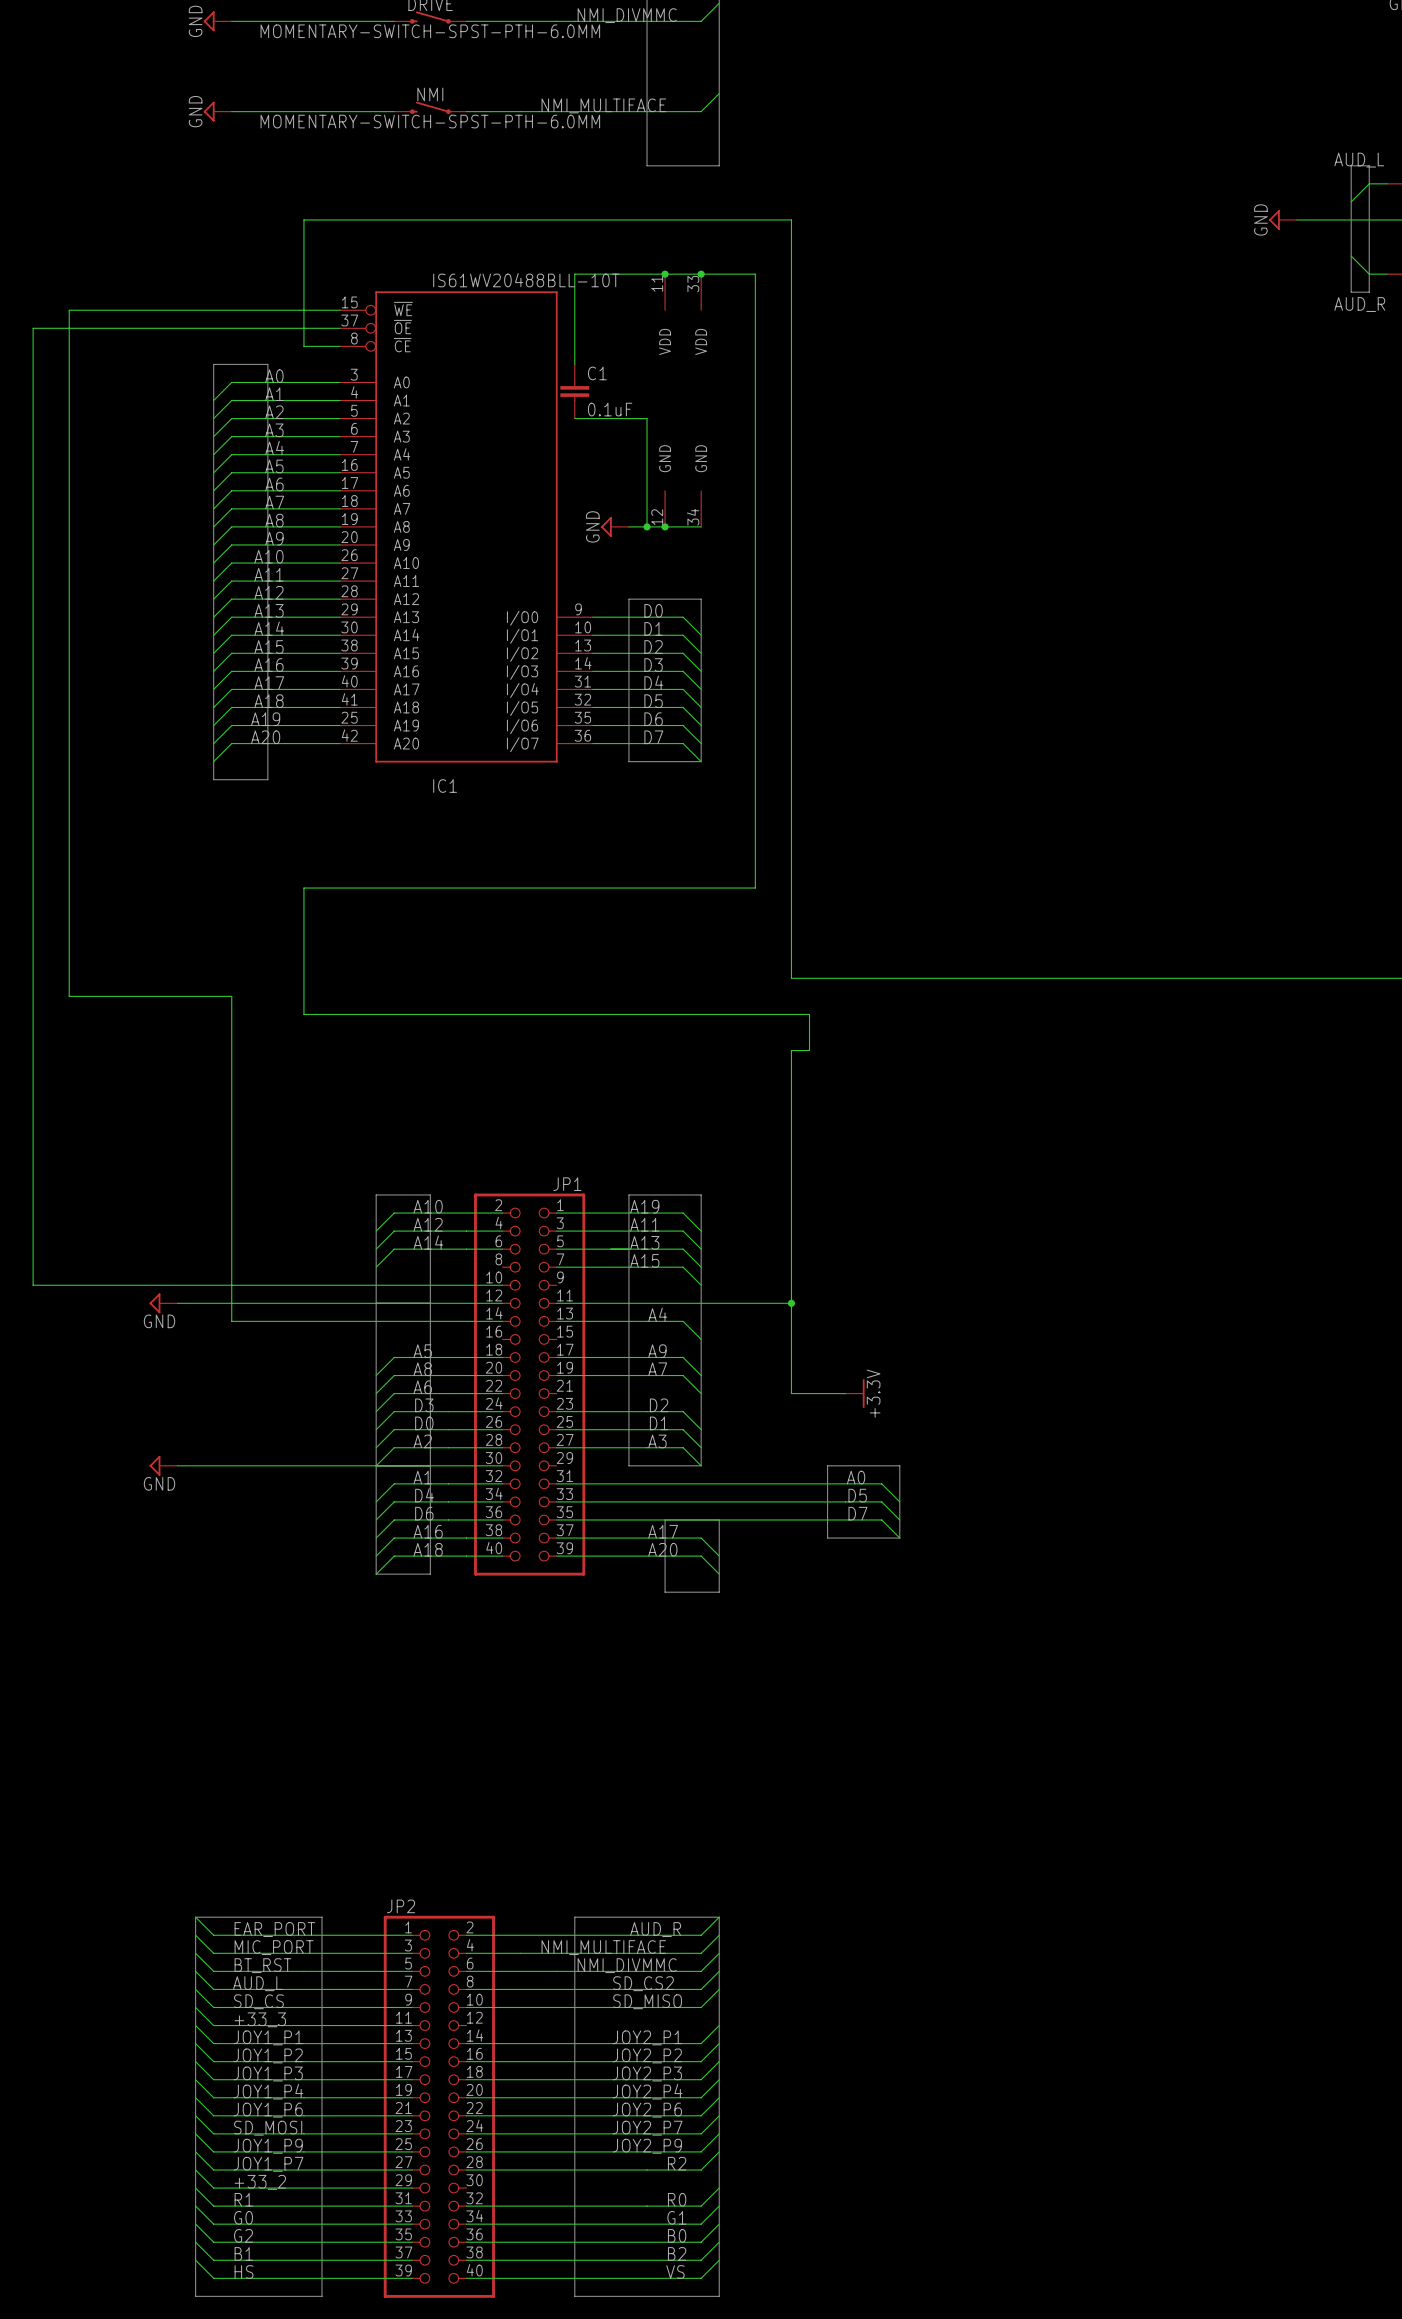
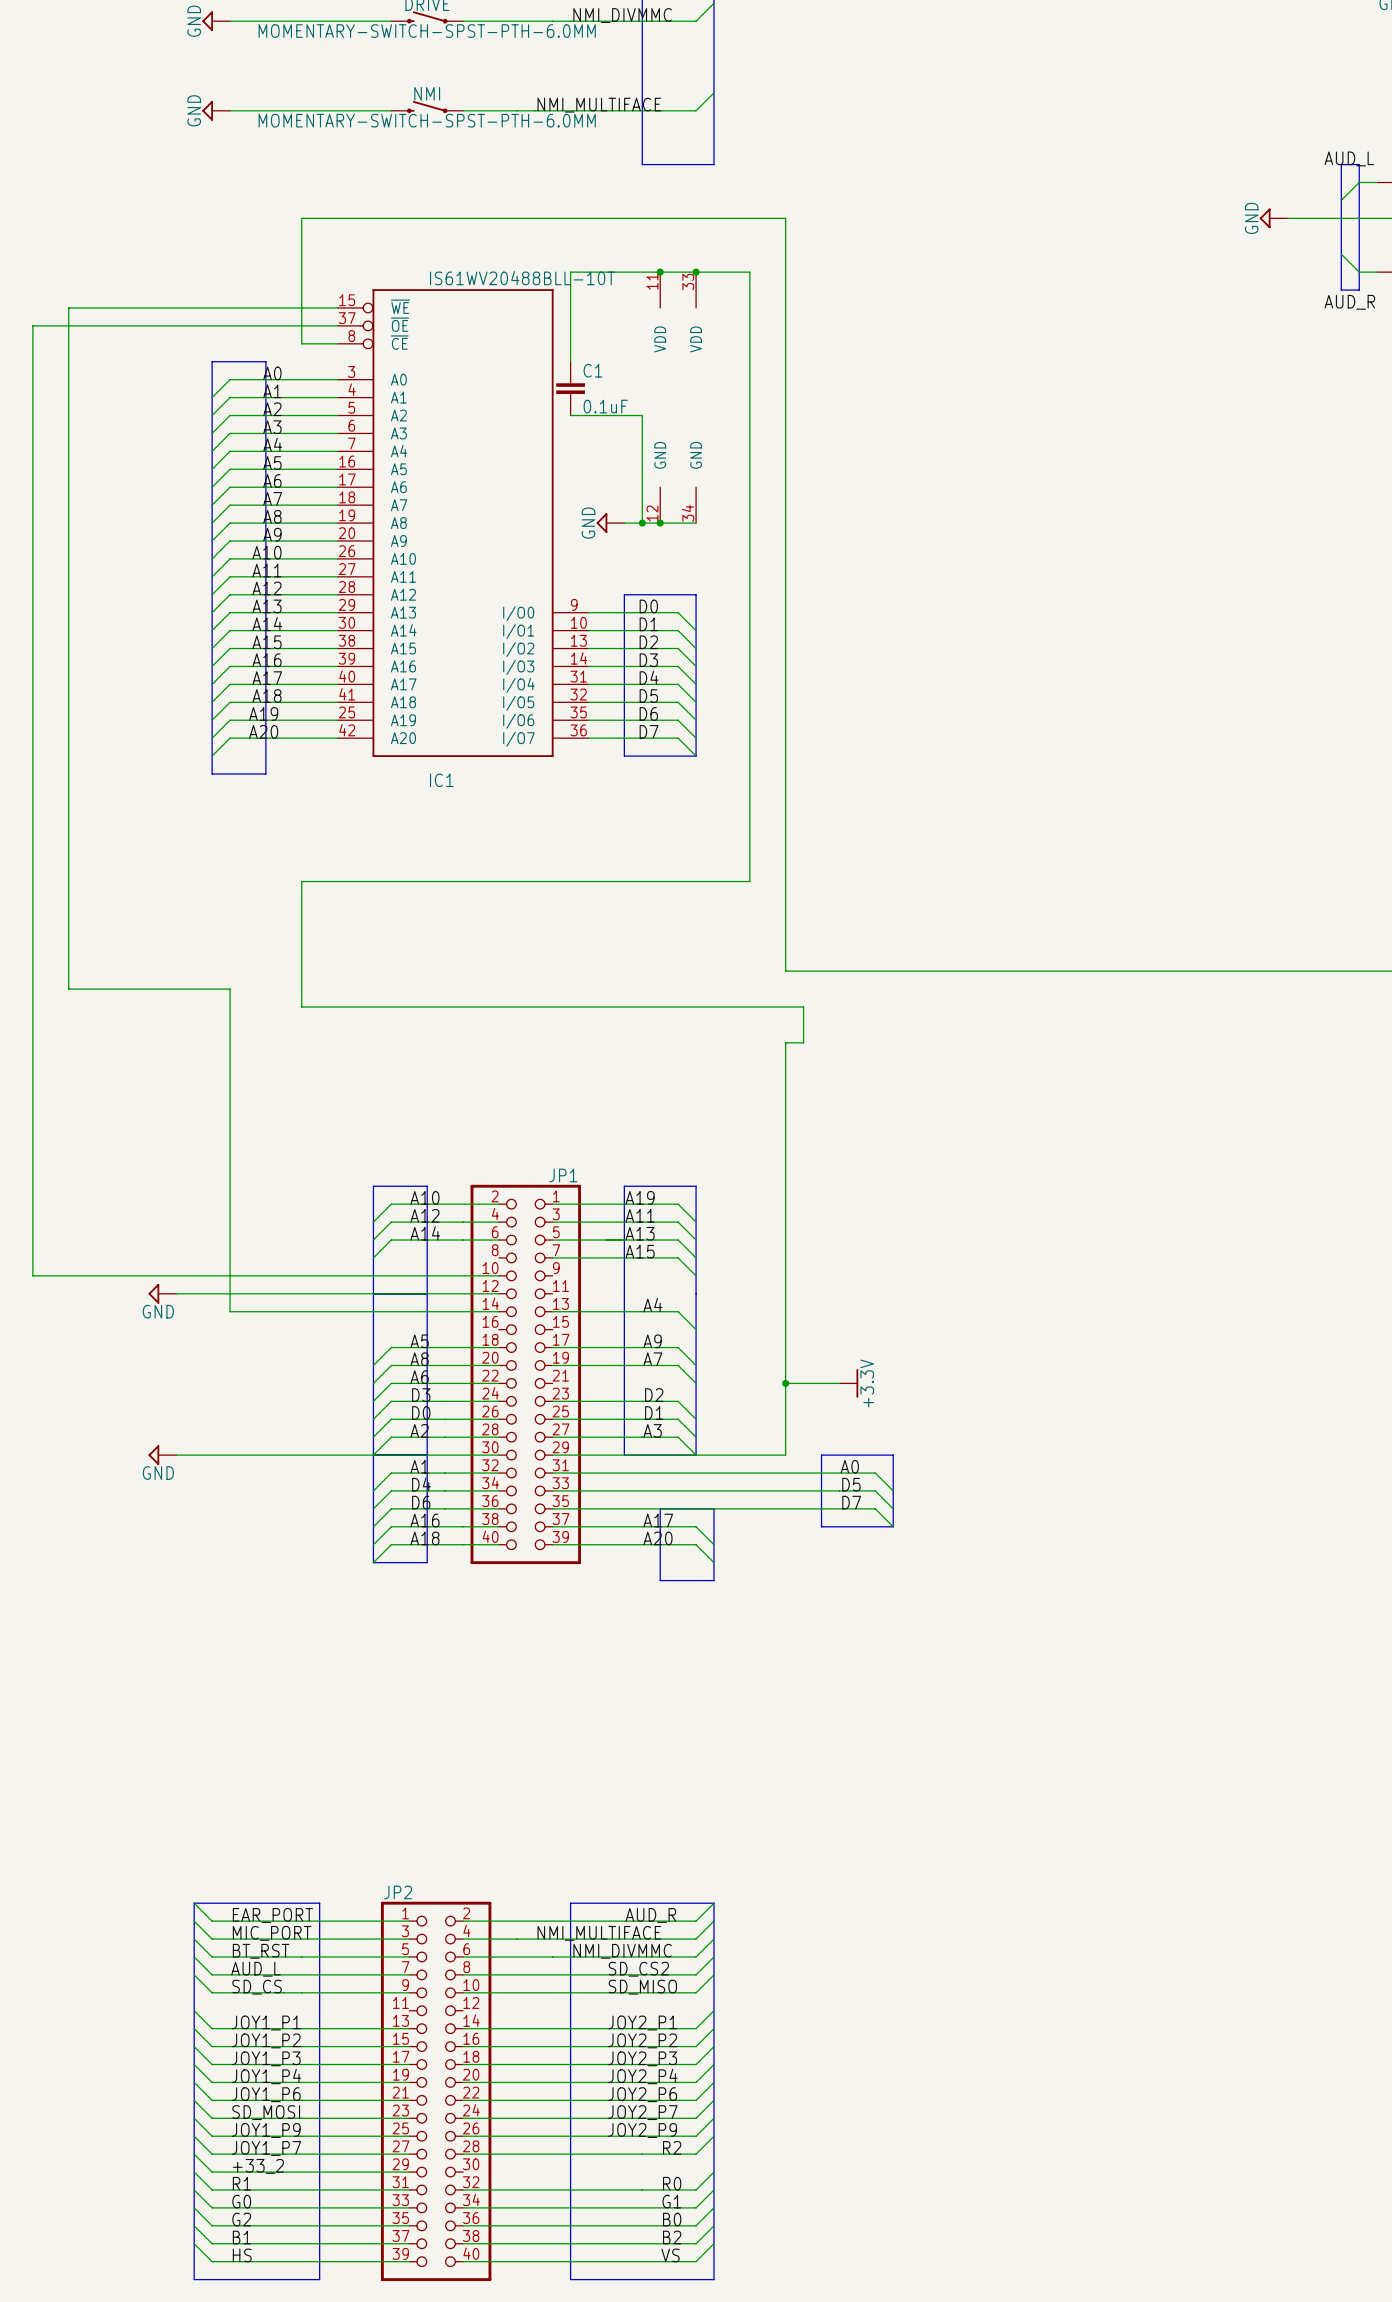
wire: (556, 1303) (791, 1303) -> none
junction: (791, 1303) -> none
wire: none -> (785, 1383) (785, 1455) (552, 1455)
junction: none -> (785, 1383)
wire: (195, 2007) (213, 2025) (412, 2025) -> none
label: +33_3 (260, 2019) -> none

